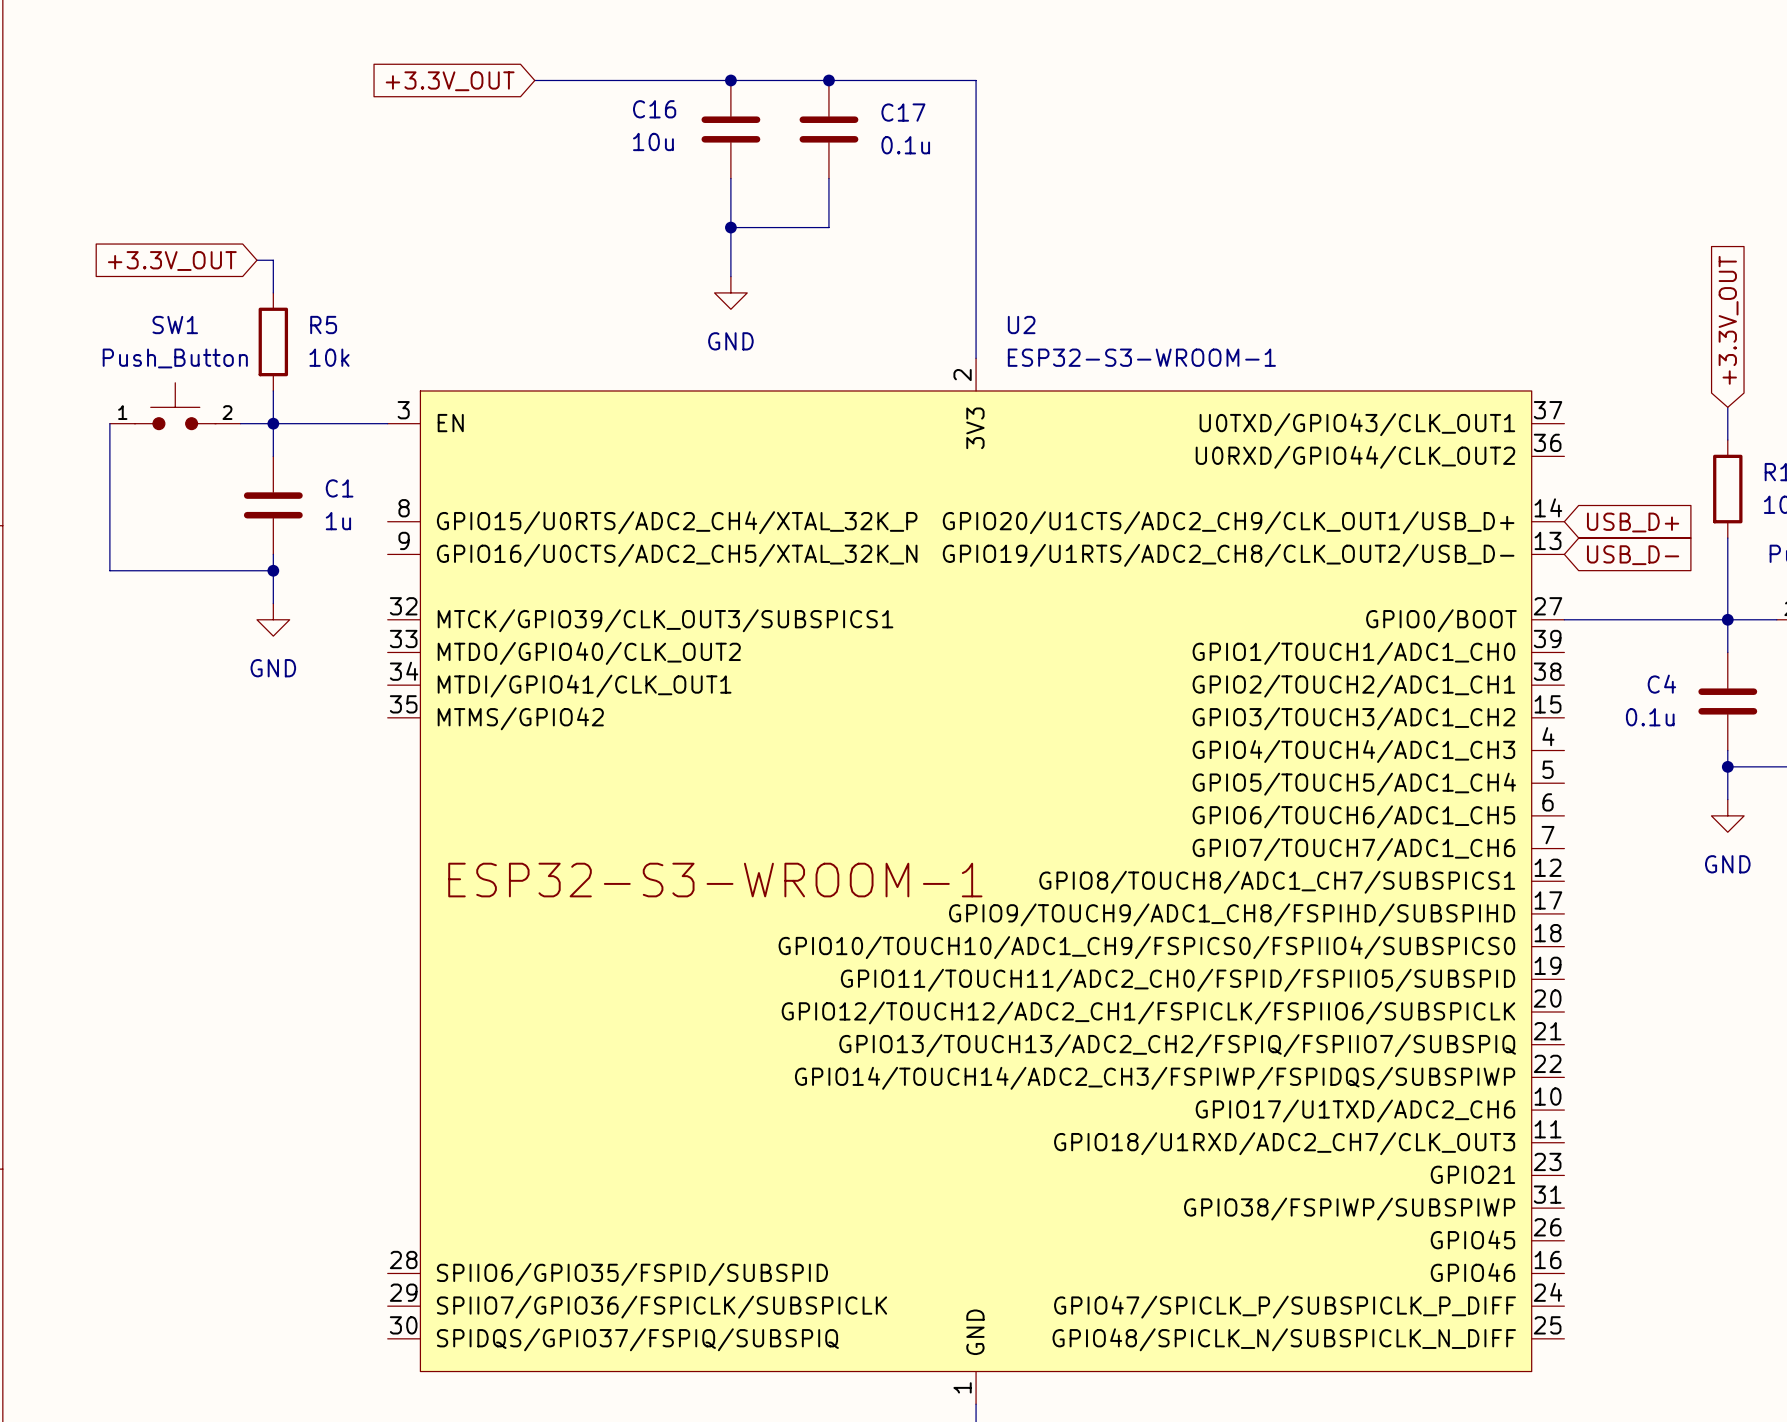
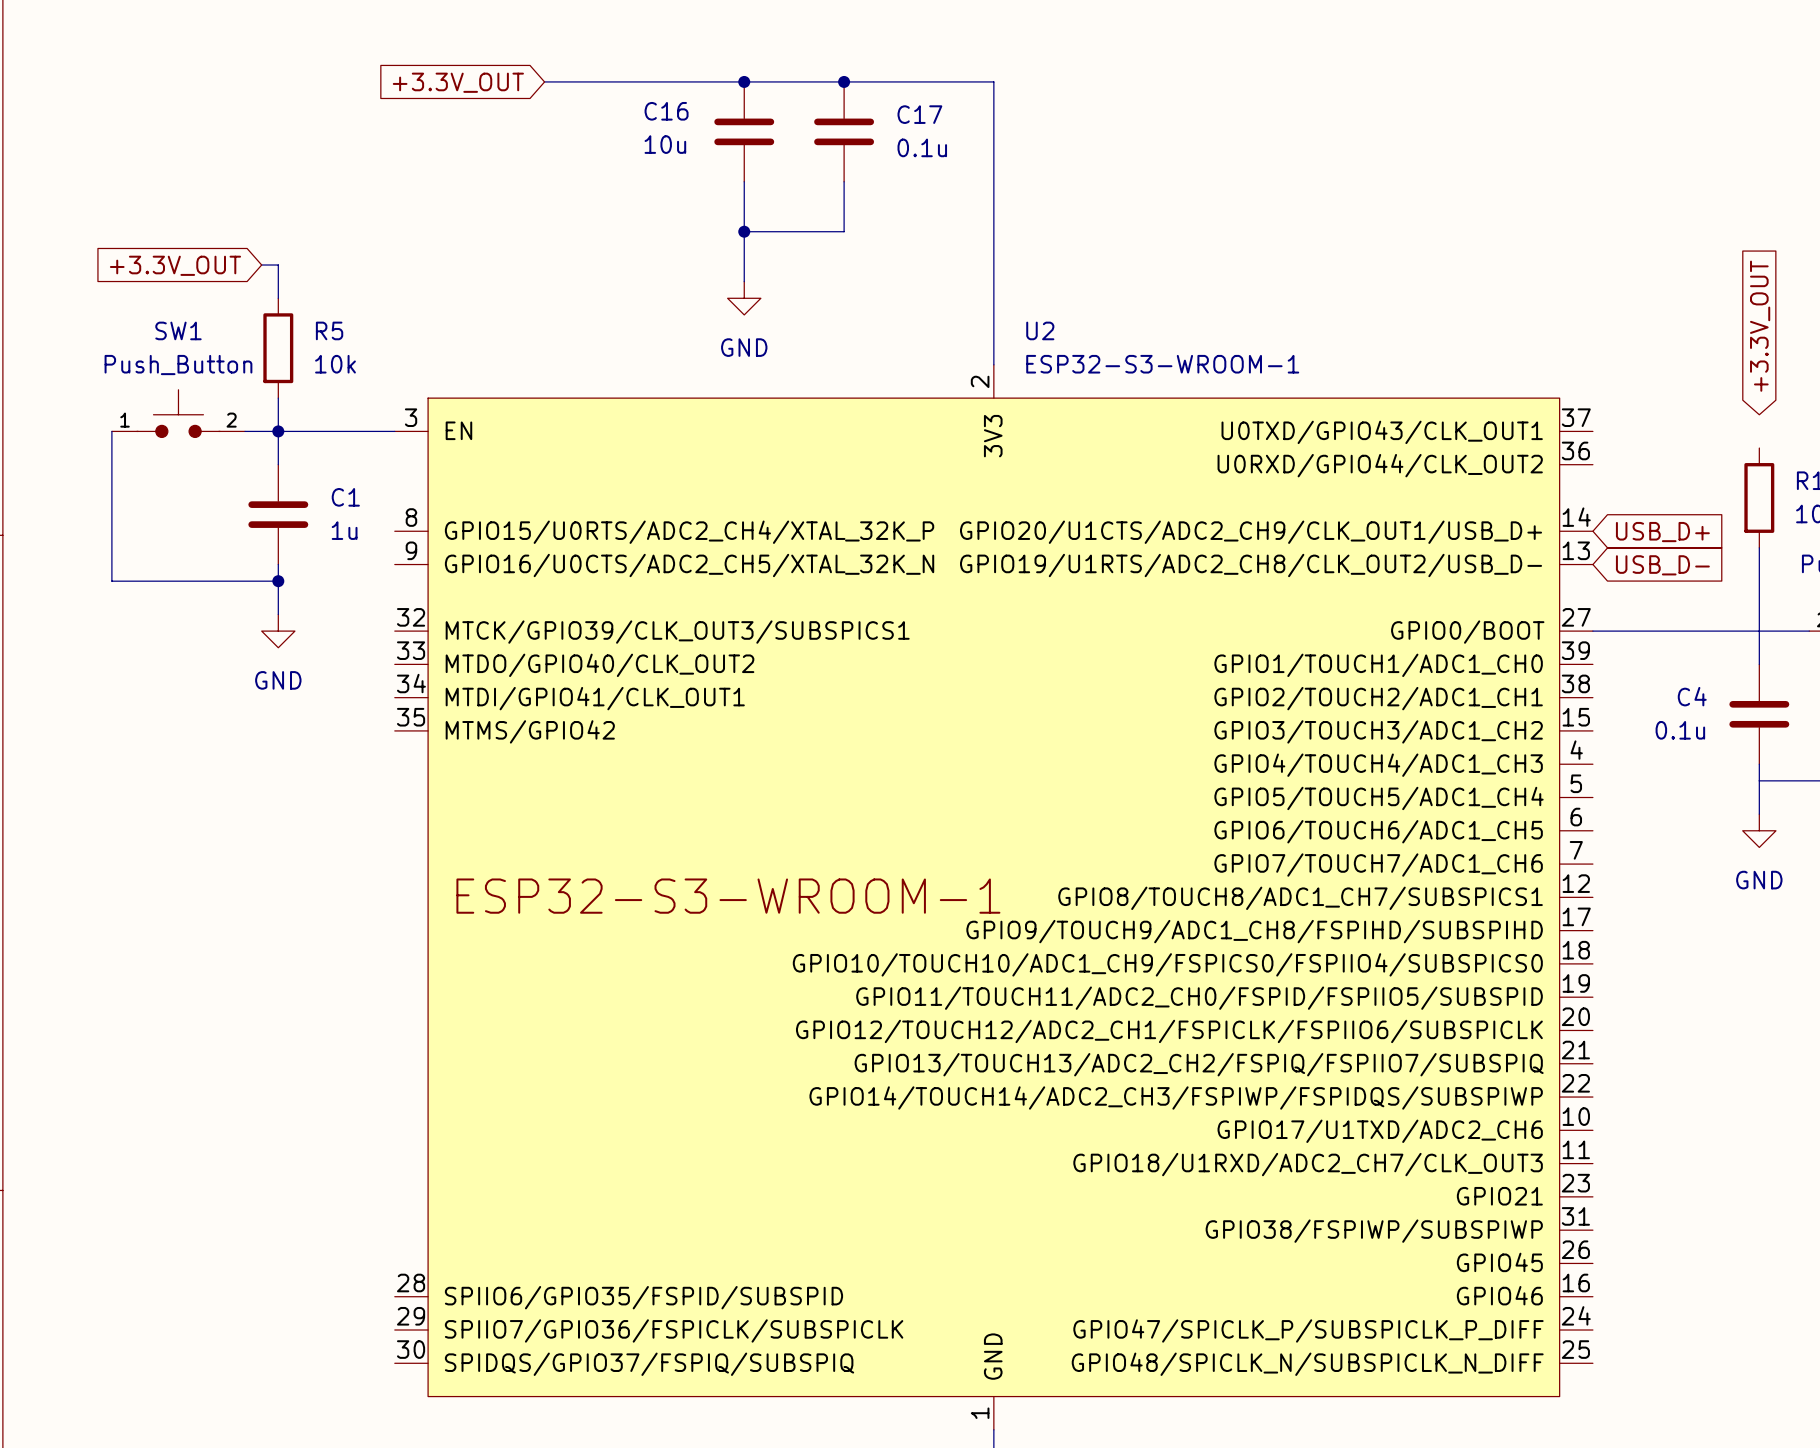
wire: (1727, 407) (1727, 440) -> none
junction: (1727, 619) -> none
junction: (1727, 766) -> none

